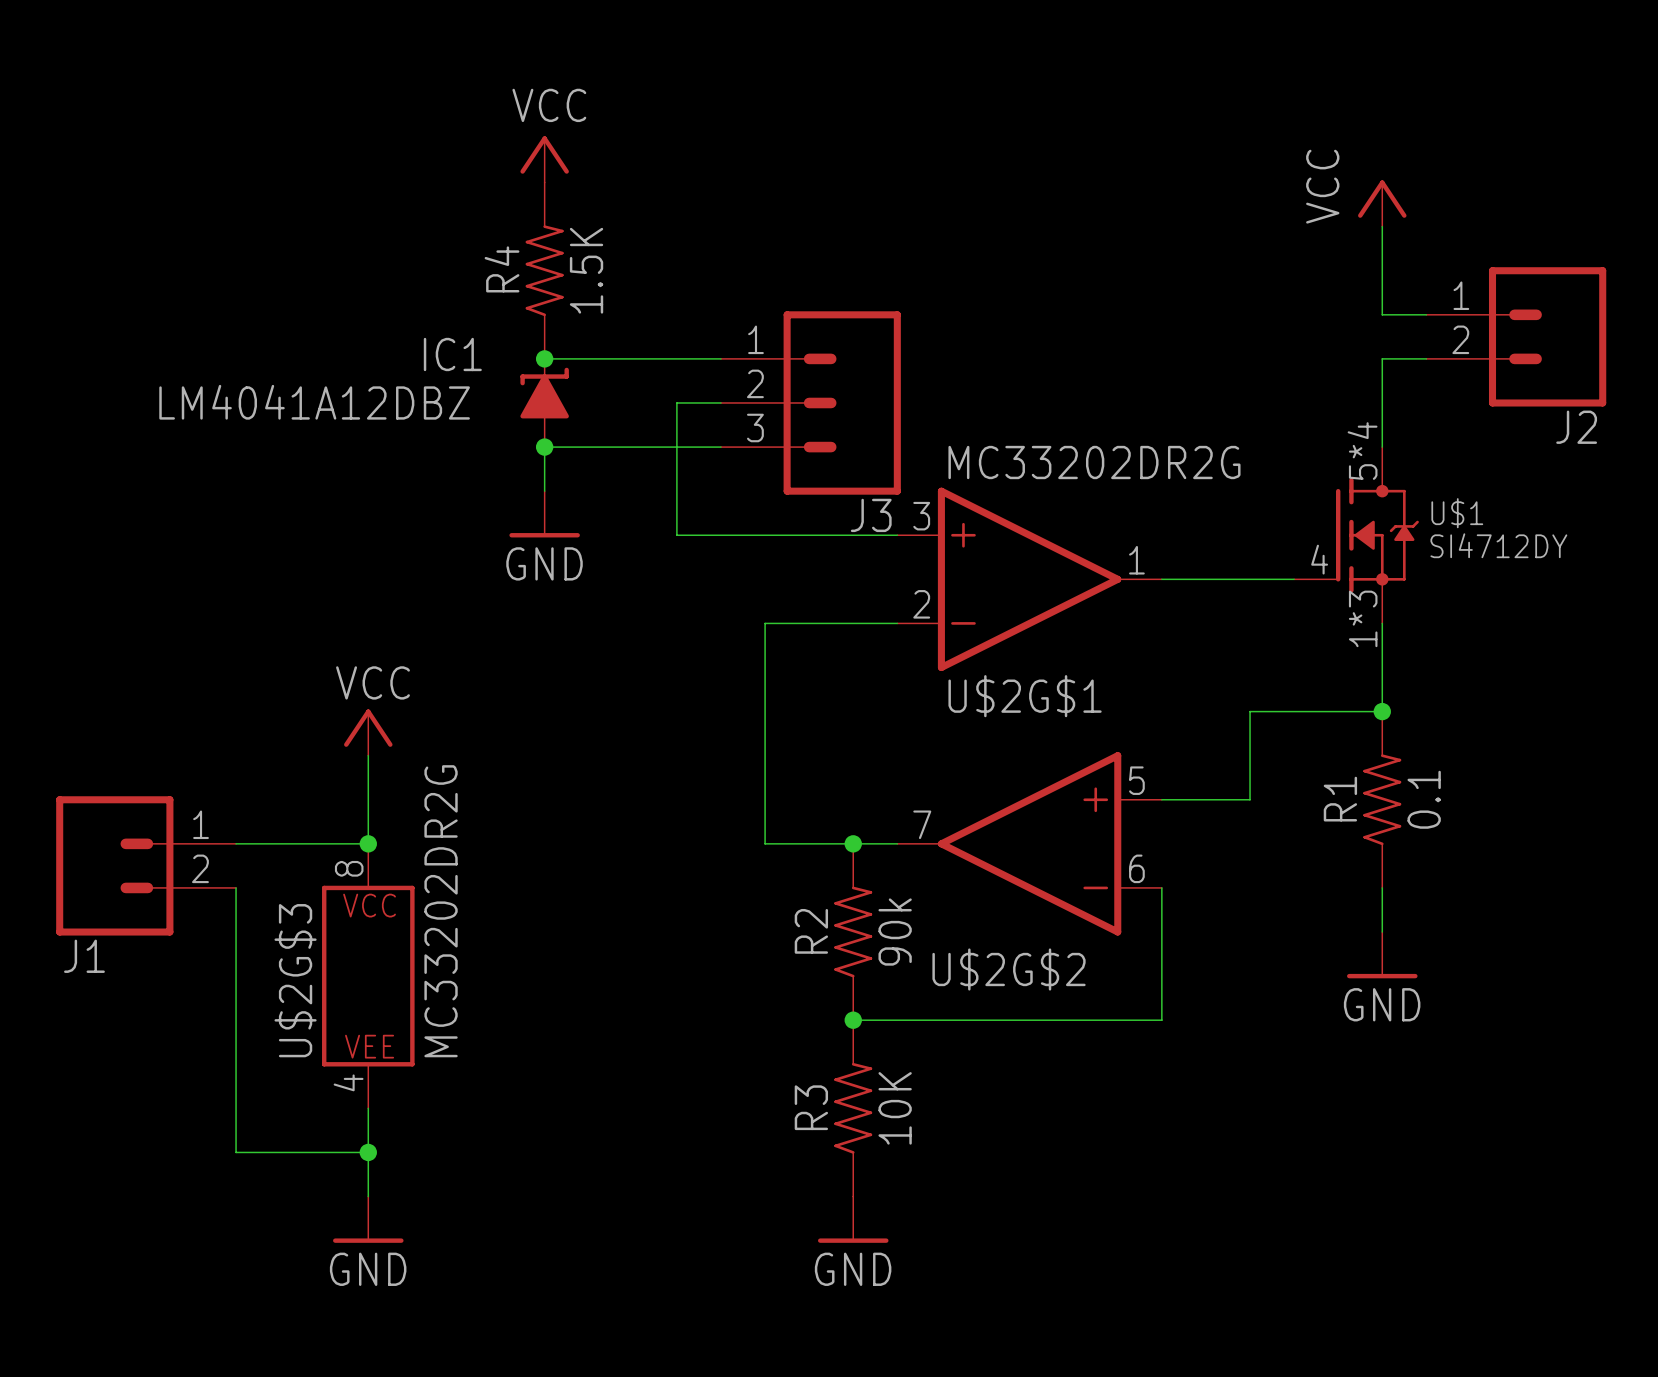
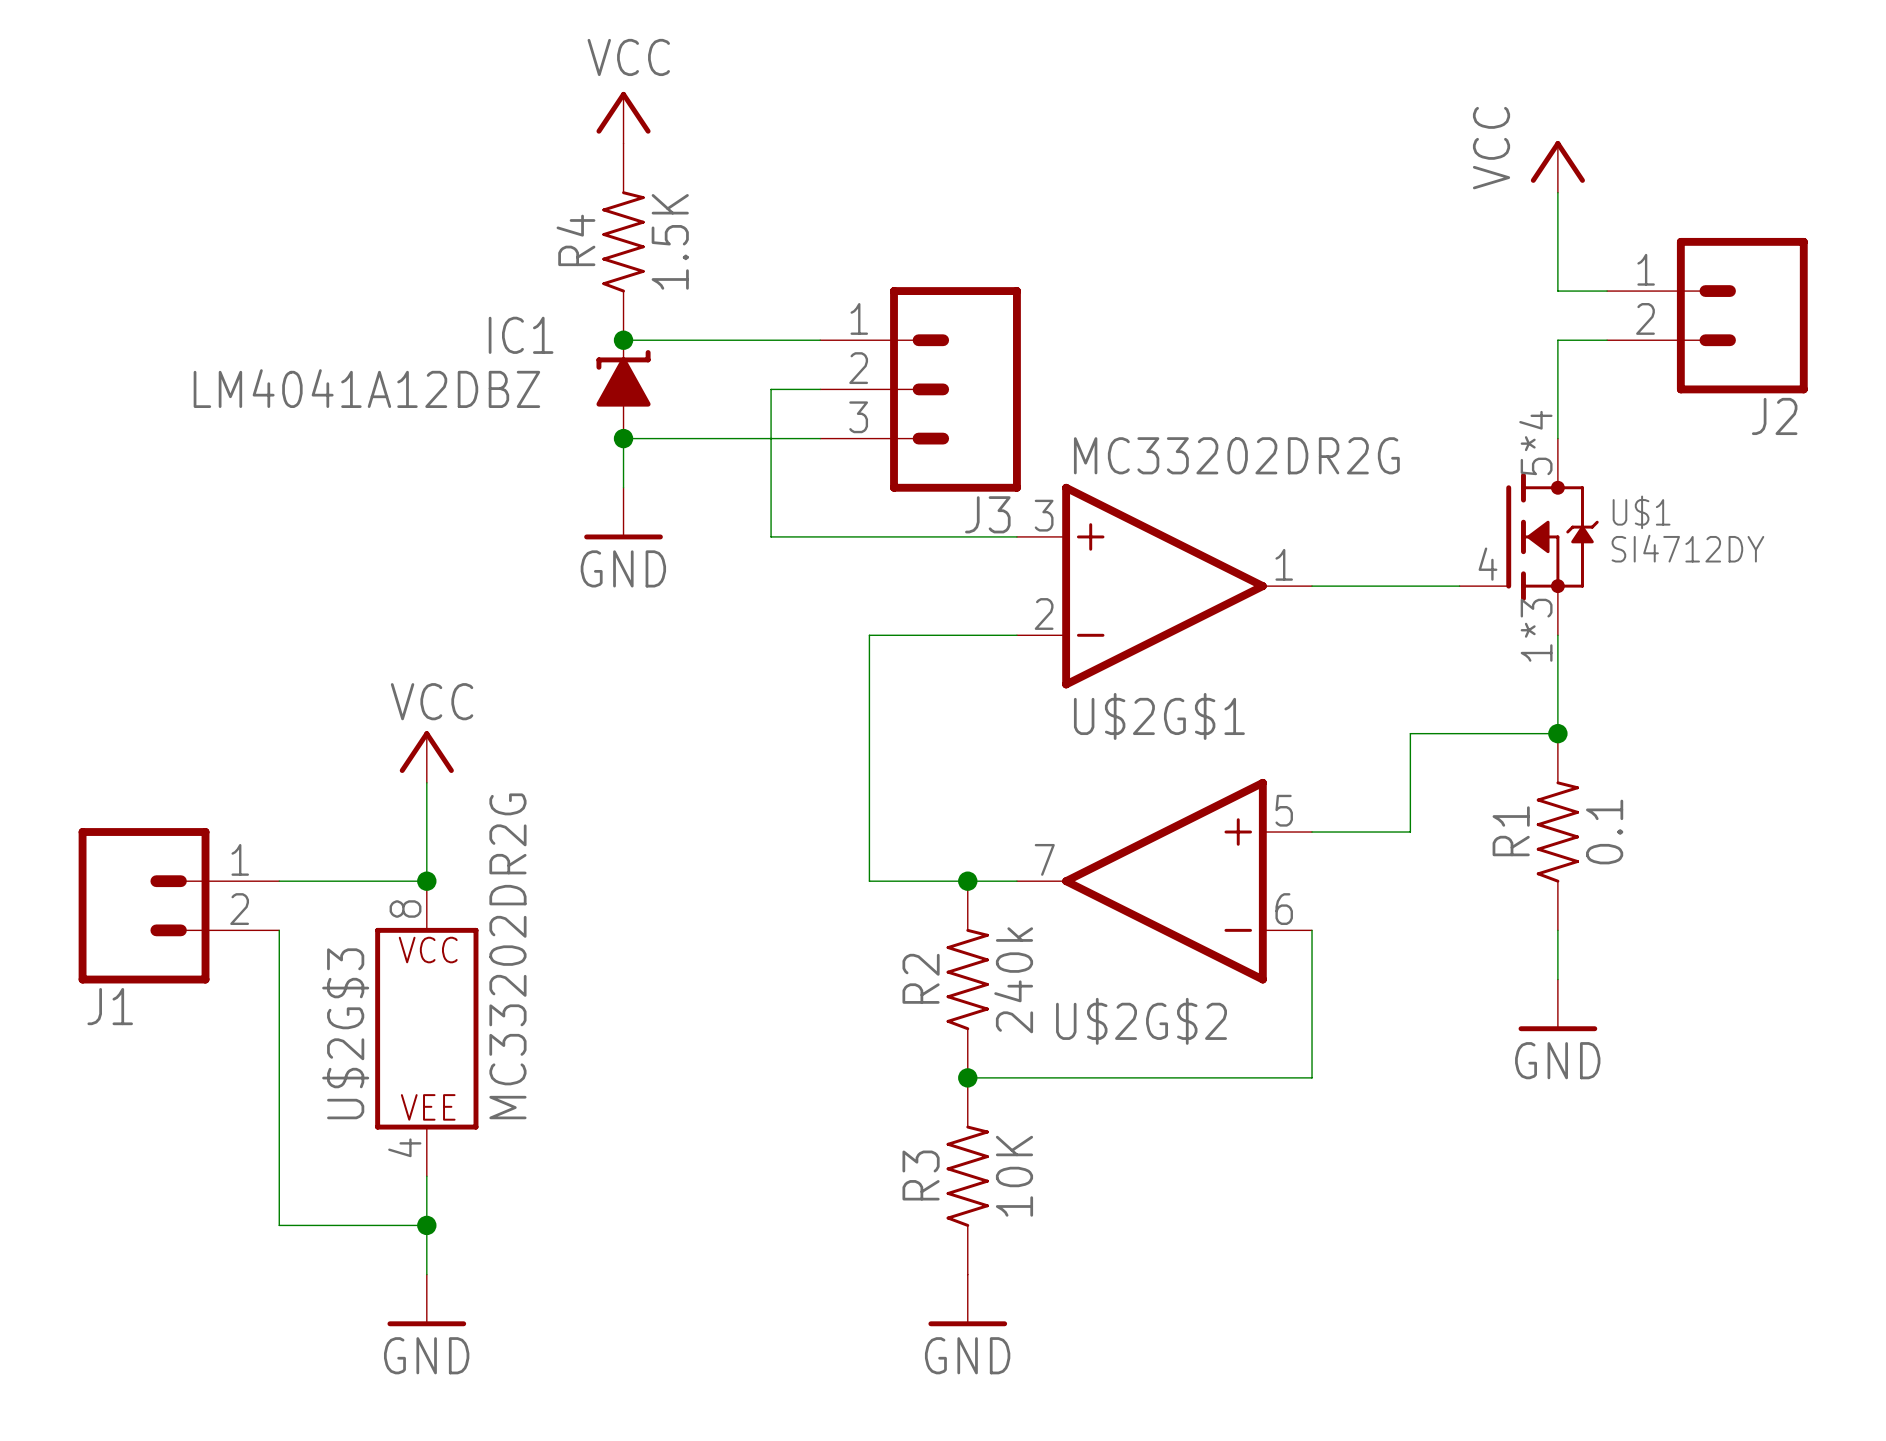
R2 value: 90k (895, 932) -> 240k (1013, 980)

